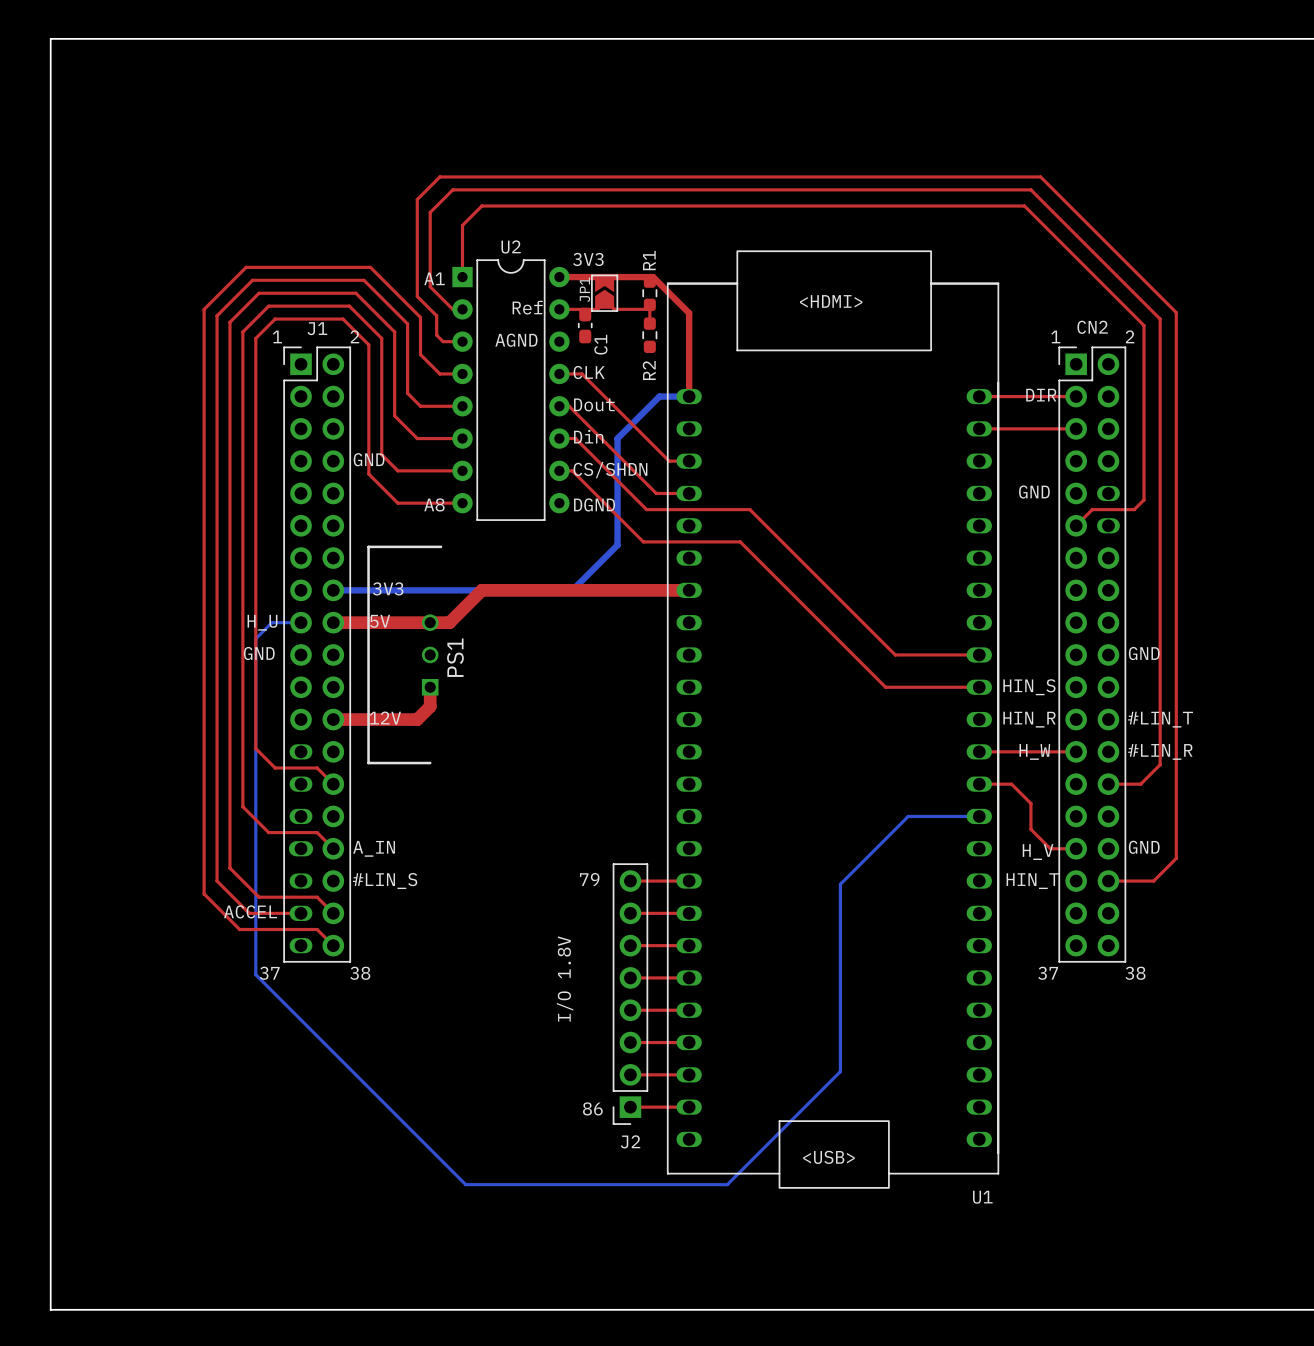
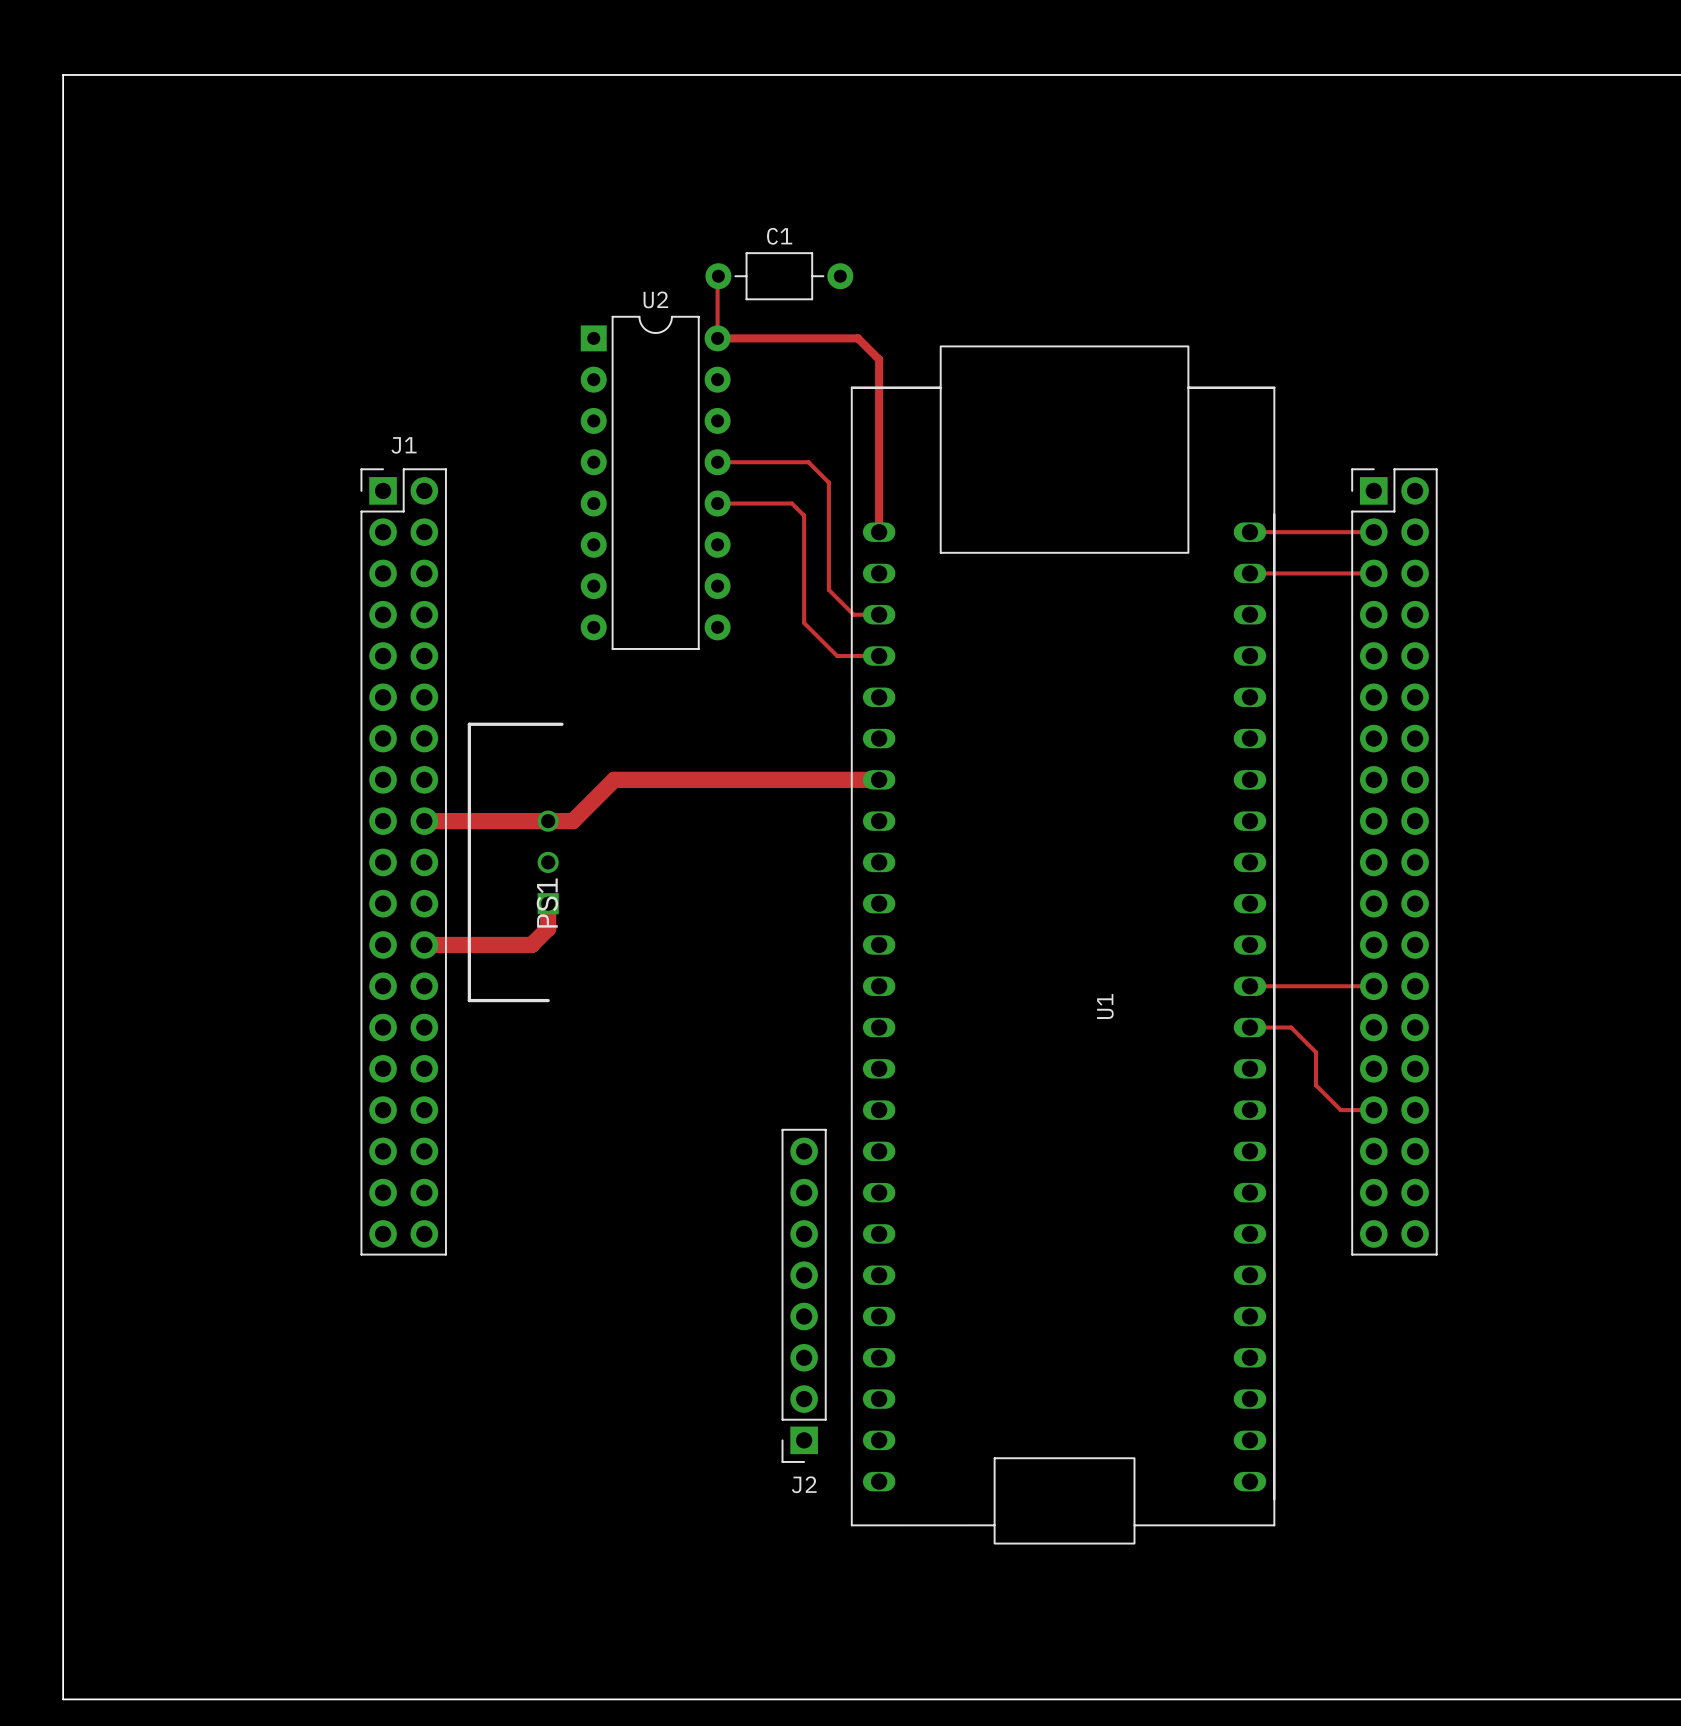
U1 footprint: [666, 250, 1000, 1189] -> [850, 345, 1276, 1545]
text: 3V3 (588, 259) -> none
top track: (462, 277) (462, 225) (481, 206) (1024, 206) (1144, 325) (1144, 499) (1134, 509) (1092, 509) (1076, 525) -> none
top track: (559, 277) (653, 277) (689, 313) -> (718, 276) (717, 338) (858, 338) (879, 359) (879, 425)
text: A1 (434, 278) -> none
JP1: (604, 293) -> none
R1: (649, 293) -> none
text: <HDMI> (831, 301) -> none
text: Ref (527, 307) -> none
C1 footprint: [577, 307, 593, 344] -> [705, 252, 854, 301]
top track: (462, 309) (452, 309) (430, 286) (430, 212) (452, 189) (1030, 189) (1160, 319) (1160, 764) (1140, 784) (1108, 784) -> none
top track: (559, 309) (597, 309) (604, 302) (607, 302) (614, 309) (645, 309) (649, 304) (649, 323) -> none
text: CN2 (1092, 327) -> none
R2: (649, 335) -> none
text: 1 (277, 336) -> none
text: 2 (354, 336) -> none
text: 1 (1055, 336) -> none
text: 2 (1130, 336) -> none
text: AGND (516, 340) -> none
top track: (462, 341) (443, 341) (436, 335) (436, 315) (417, 296) (417, 199) (439, 176) (1040, 176) (1176, 312) (1176, 858) (1153, 881) (1108, 881) -> none
C1 name position: C1 (600, 344) -> C1 (779, 236)
J1 footprint: [283, 346, 1127, 963] -> [360, 468, 1438, 1256]
text: CLK (589, 372) -> none
top track: (462, 373) (439, 373) (420, 354) (420, 317) (370, 267) (246, 267) (204, 309) (204, 893) (239, 929) (317, 929) (333, 945) -> none
top track: (559, 373) (582, 373) (649, 441) -> (717, 462) (808, 462) (828, 482) (828, 589)
U2 position: (510, 390) -> (655, 482)
text: DIR (1041, 395) -> none
bottom track: (689, 396) (659, 396) (617, 438) (617, 545) (572, 590) (333, 590) -> none
text: Dout (594, 404) -> none
top track: (462, 406) (420, 406) (407, 393) (407, 323) (363, 280) (252, 280) (217, 315) (217, 881) (249, 913) (301, 913) -> none
top track: (559, 406) (569, 406) (630, 467) -> (717, 503) (791, 503) (804, 515) (804, 622)
text: Din (588, 436) -> none
top track: (462, 438) (417, 438) (394, 415) (394, 331) (355, 293) (259, 293) (229, 322) (229, 868) (259, 897) (317, 897) (333, 913) -> none
top track: (559, 438) (575, 438) (646, 509) (749, 509) (895, 654) (979, 654) -> none
text: GND (369, 459) -> none
top track: (462, 470) (397, 470) (381, 454) (381, 338) (349, 306) (268, 306) (242, 331) (242, 806) (268, 832) (317, 832) (333, 848) -> none
top track: (559, 470) (572, 470) (643, 541) (740, 541) (885, 687) (979, 687) -> none
text: CS/SHDN (610, 470) -> none
text: GND (1034, 492) -> none
top track: (462, 503) (397, 503) (368, 474) (368, 344) (343, 319) (275, 319) (255, 338) (255, 748) (275, 768) (317, 768) (333, 784) -> none
text: A8 (434, 504) -> none
text: DGND (594, 504) -> none
text: 3V3 (388, 588) -> none
text: 5V (380, 621) -> none
text: H_U (262, 622) -> none
bottom track: (301, 622) (271, 622) (255, 638) (255, 974) (465, 1184) (727, 1184) (840, 1071) (840, 884) (908, 816) (979, 816) -> none
text: GND (259, 653) -> none
text: GND (1144, 653) -> none
PS1 name position: PS1 (455, 657) -> PS1 (547, 903)
text: HIN_S (1029, 687) -> none
text: 12V (385, 718) -> none
text: HIN_R (1029, 719) -> none
text: #LIN_T (1160, 719) -> none
text: H_W (1034, 751) -> none
text: #LIN_R (1160, 751) -> none
text: GND (1144, 847) -> none
text: A_IN (374, 848) -> none
text: H_V (1038, 852) -> none
text: 79 (589, 879) -> none
text: #LIN_S (385, 881) -> none
top track: (630, 881) (689, 881) -> none
text: HIN_T (1032, 881) -> none
text: ACCEL (250, 911) -> none
top track: (630, 913) (689, 913) -> none
top track: (630, 945) (689, 945) -> none
text: 37 (269, 973) -> none
text: 38 (360, 973) -> none
text: 37 (1048, 973) -> none
text: 38 (1135, 973) -> none
top track: (630, 977) (689, 977) -> none
text: I/O 1.8V (565, 979) -> none
top track: (630, 1010) (689, 1010) -> none
top track: (630, 1042) (689, 1042) -> none
top track: (630, 1074) (689, 1074) -> none
top track: (630, 1107) (689, 1107) -> none
text: 86 (592, 1108) -> none
text: <USB> (828, 1157) -> none
U1 name position: U1 (982, 1197) -> U1 (1105, 1006)

